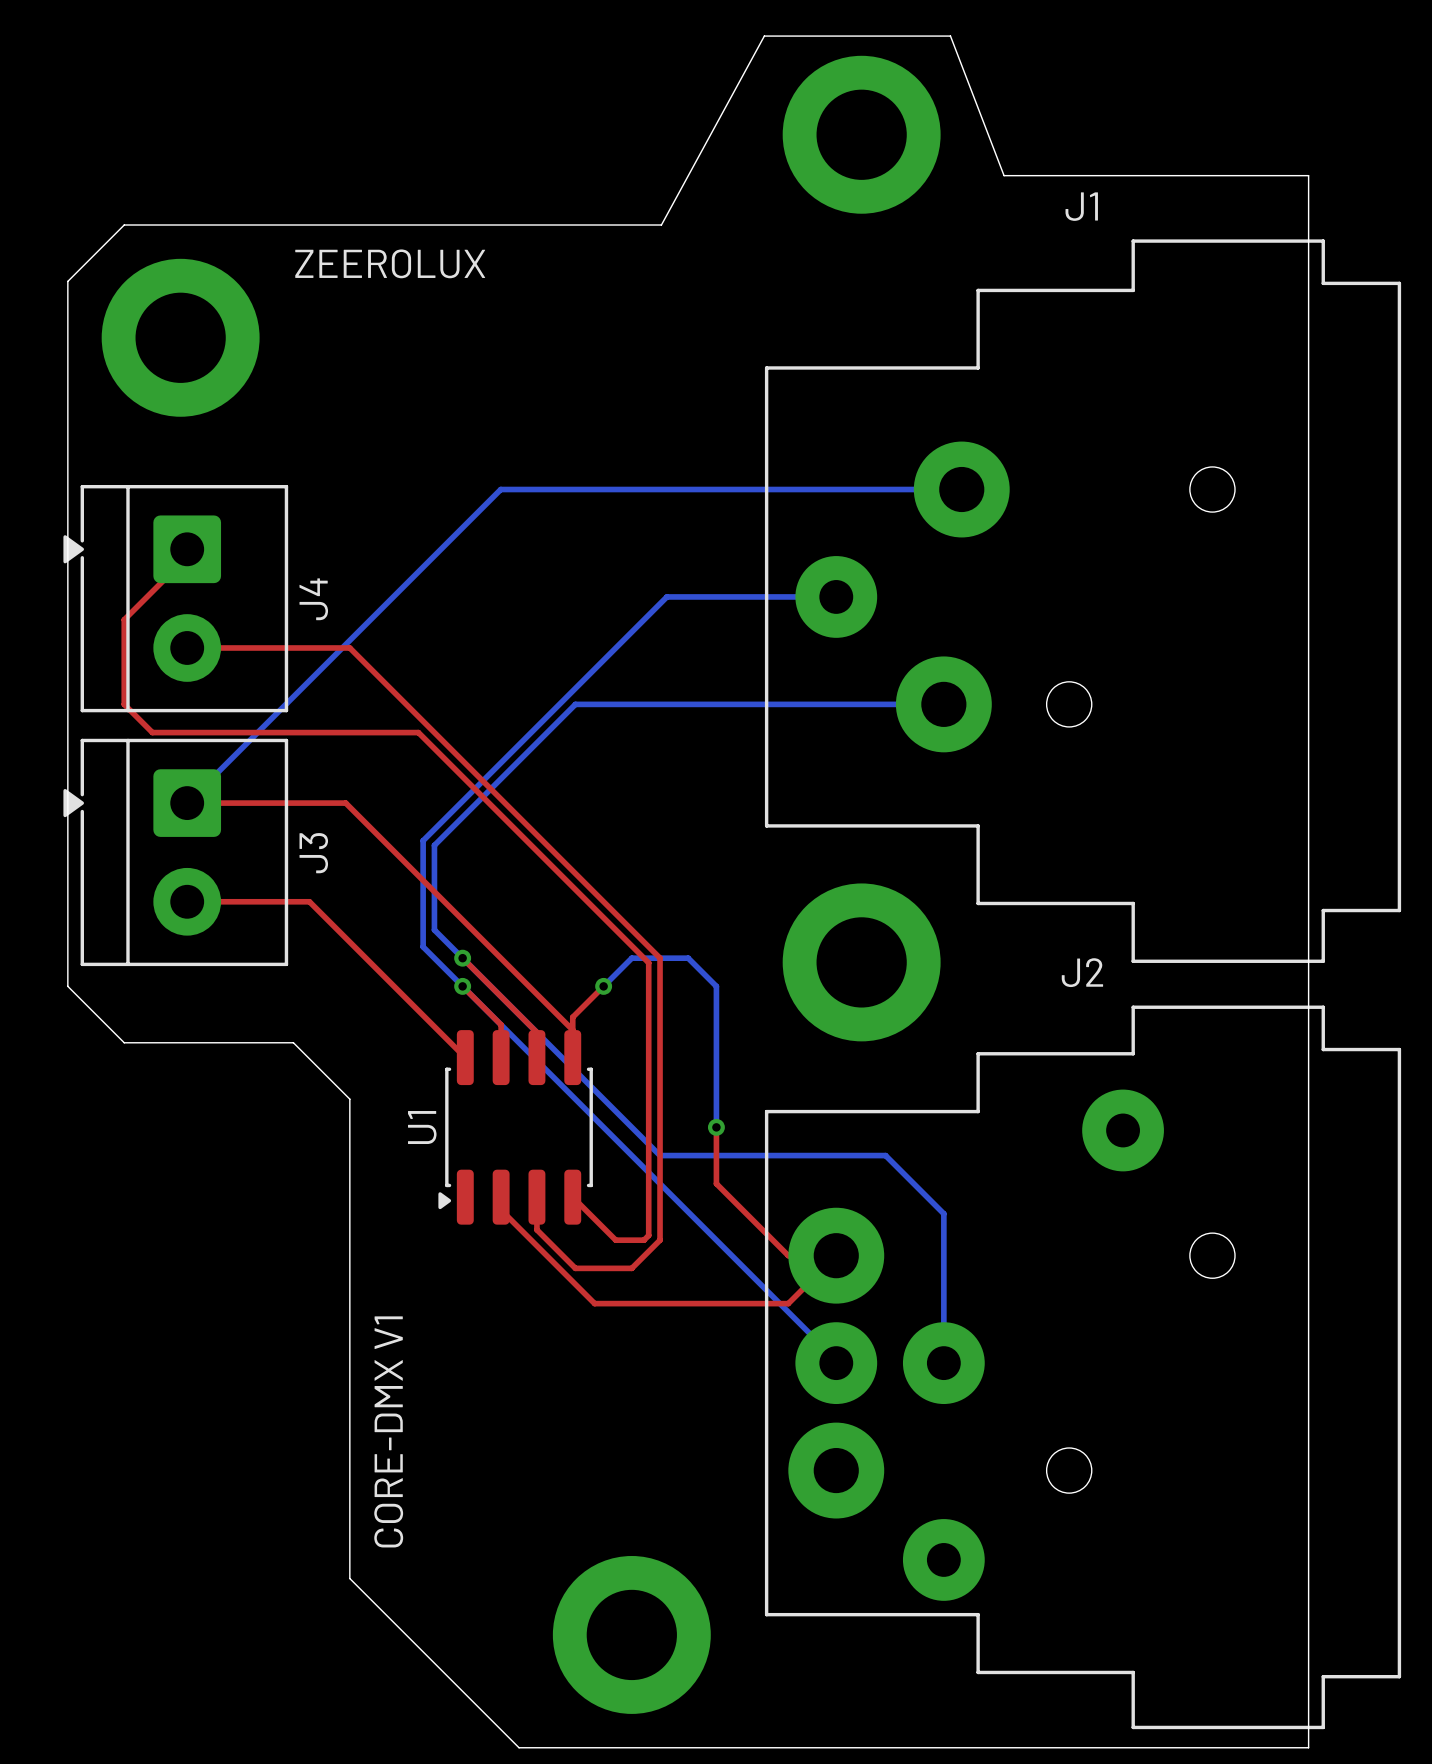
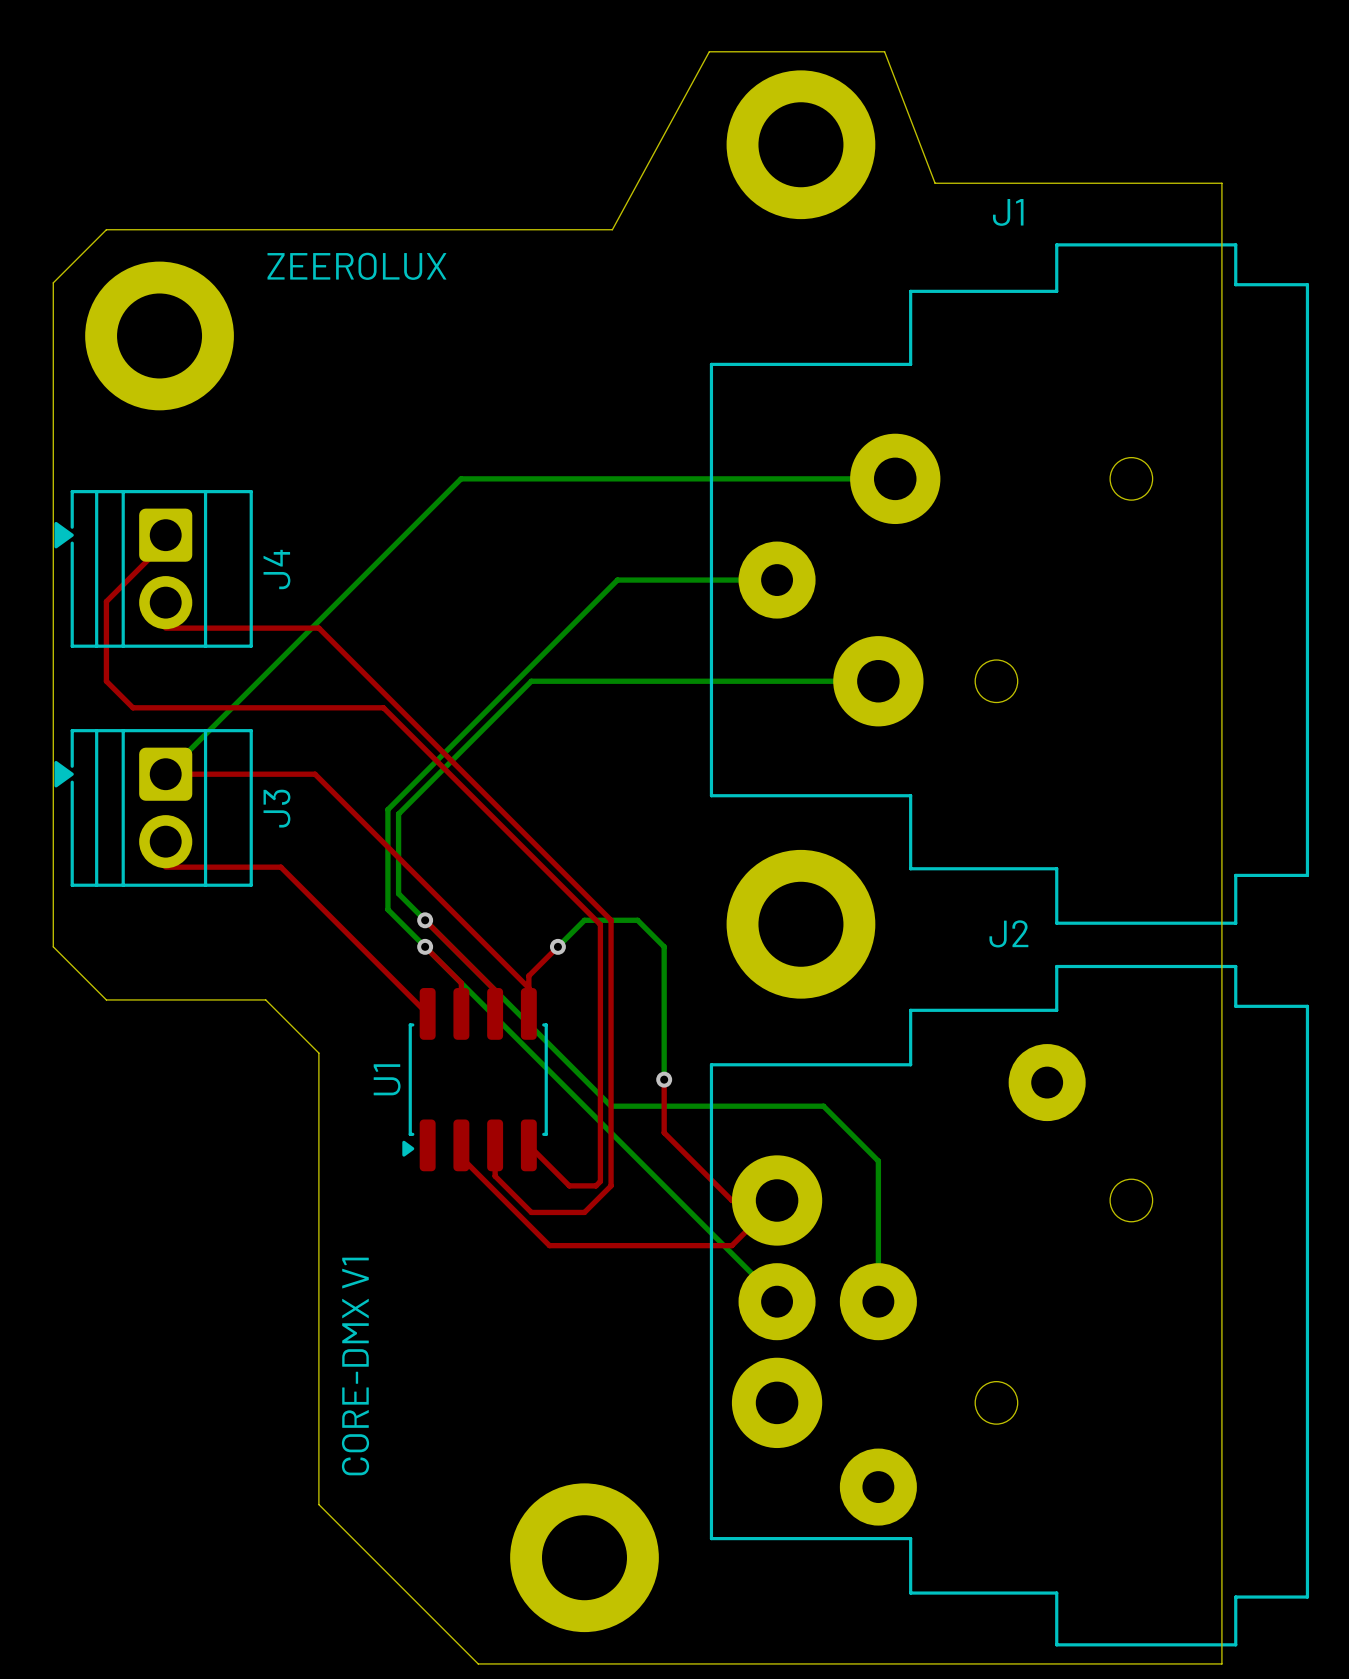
J4 footprint: [63, 485, 289, 713] -> [54, 490, 253, 648]
J3 footprint: [63, 738, 289, 967] -> [54, 729, 253, 887]

